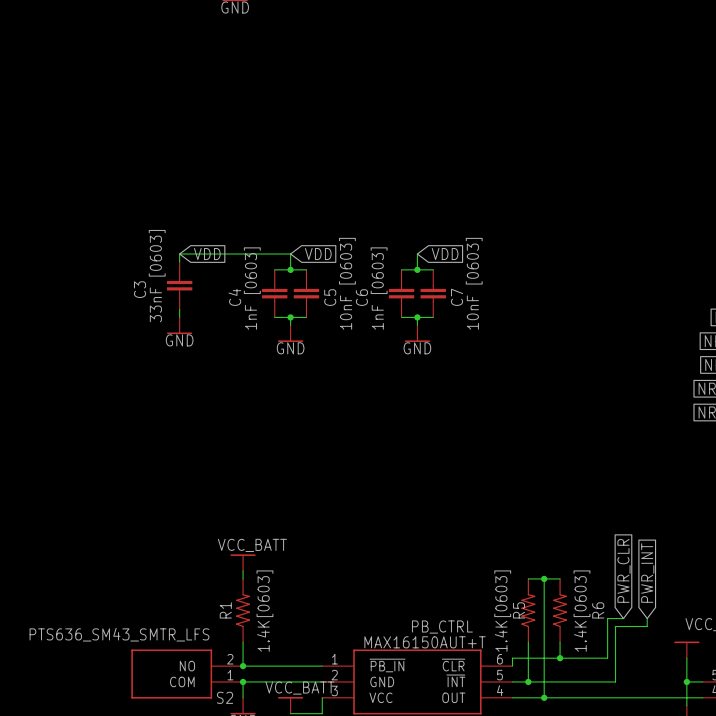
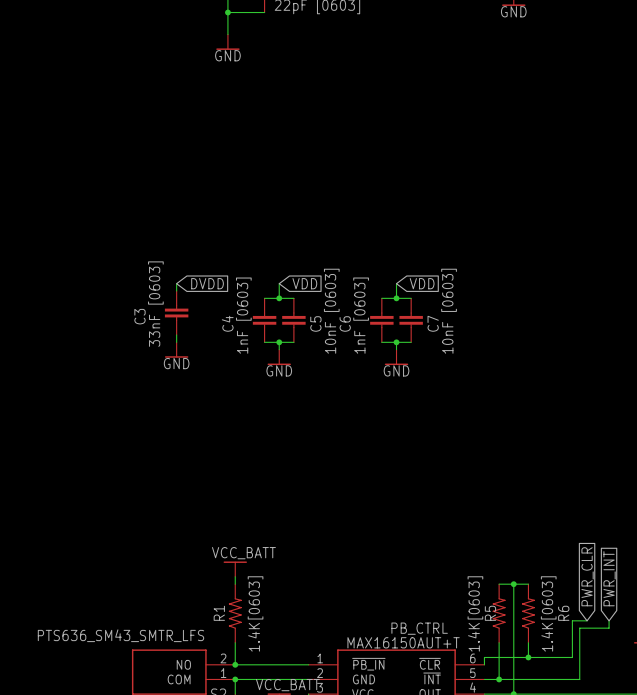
wire: (179, 254) (290, 254) -> none
global label: VDD (207, 254) -> DVDD (207, 283)

